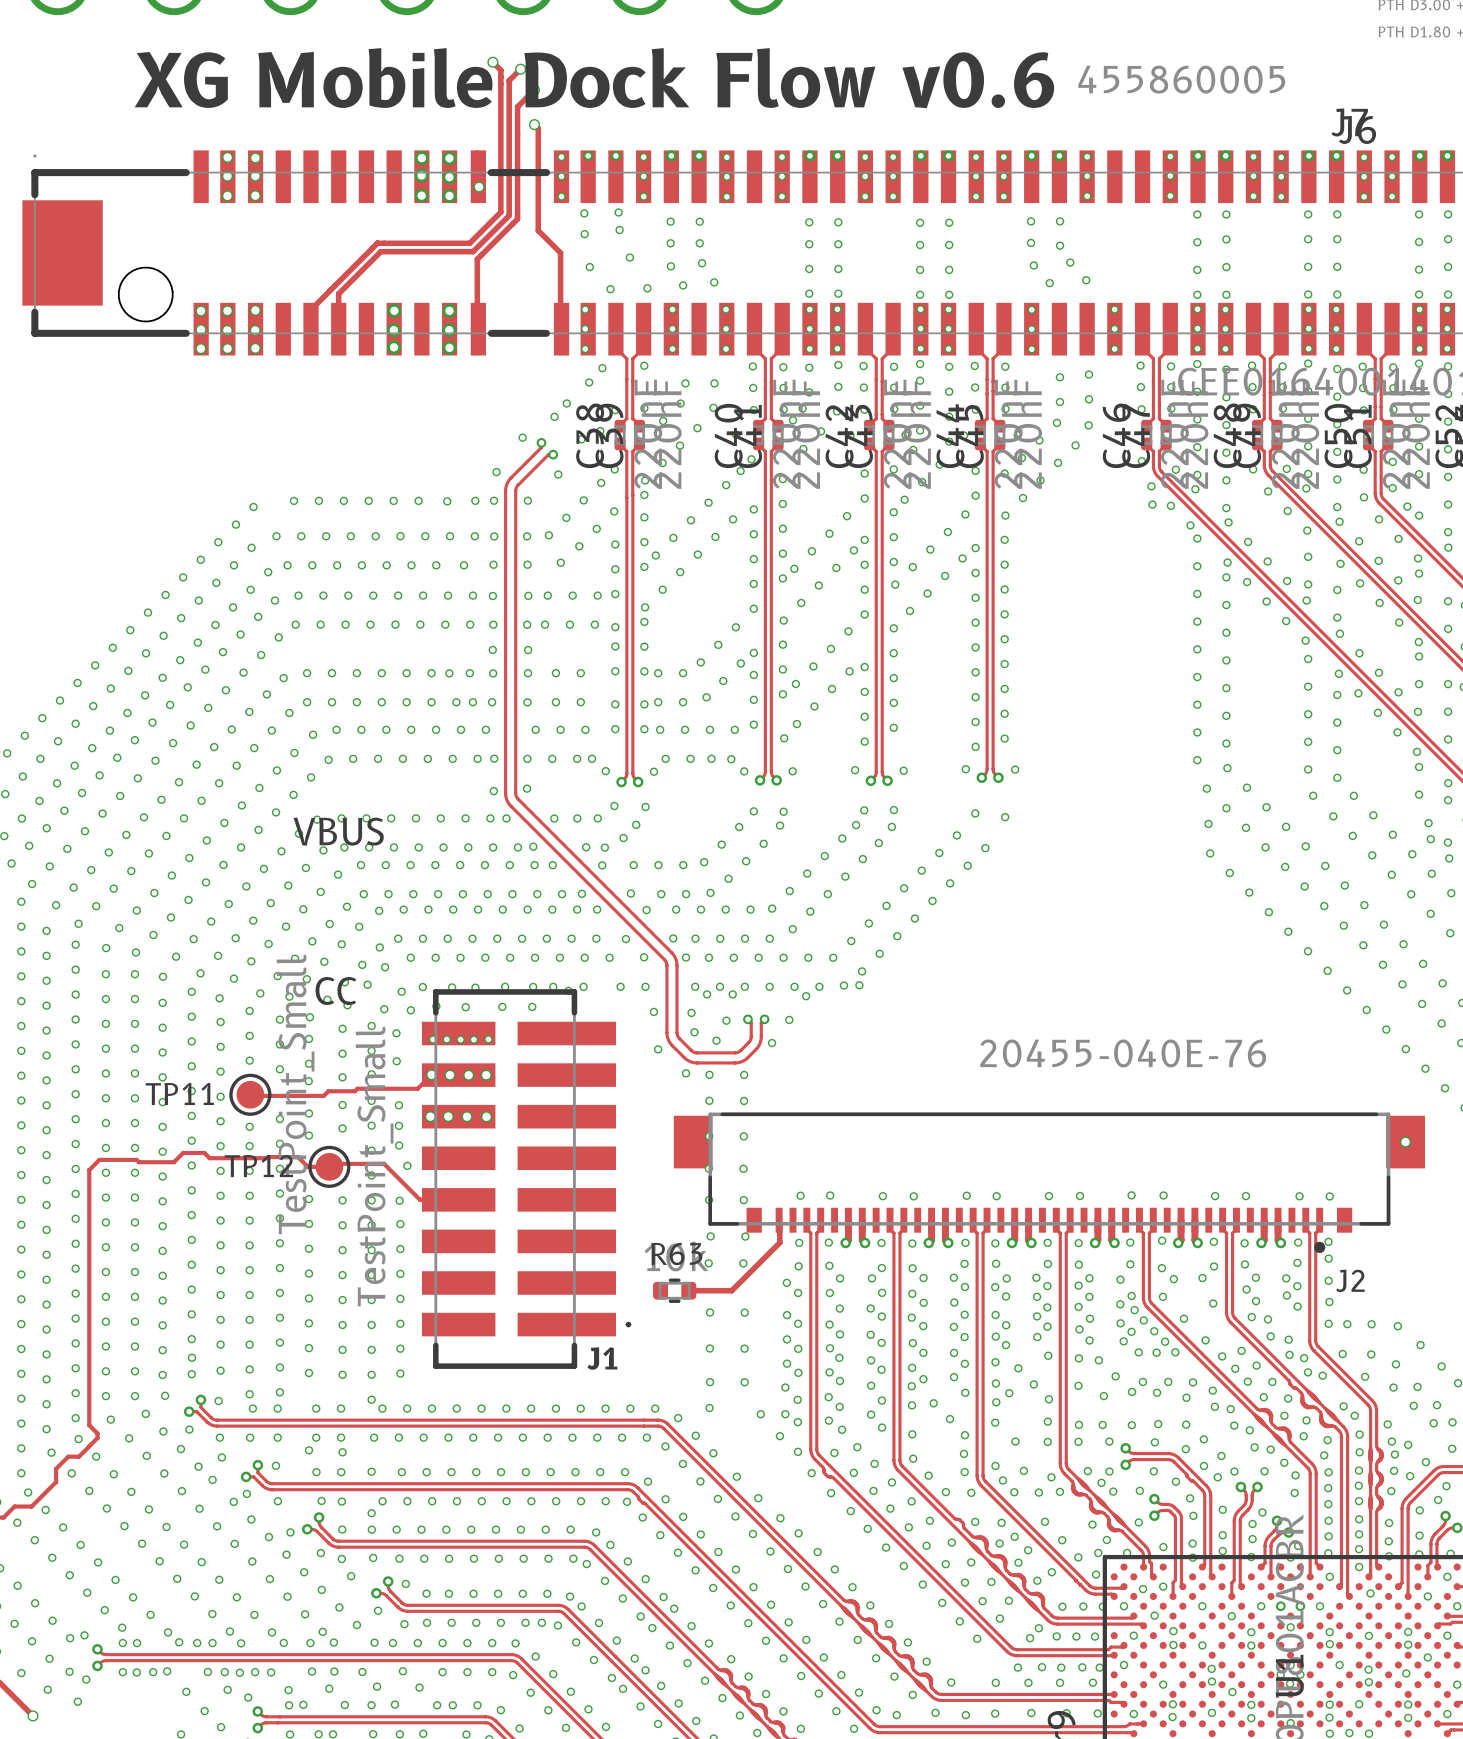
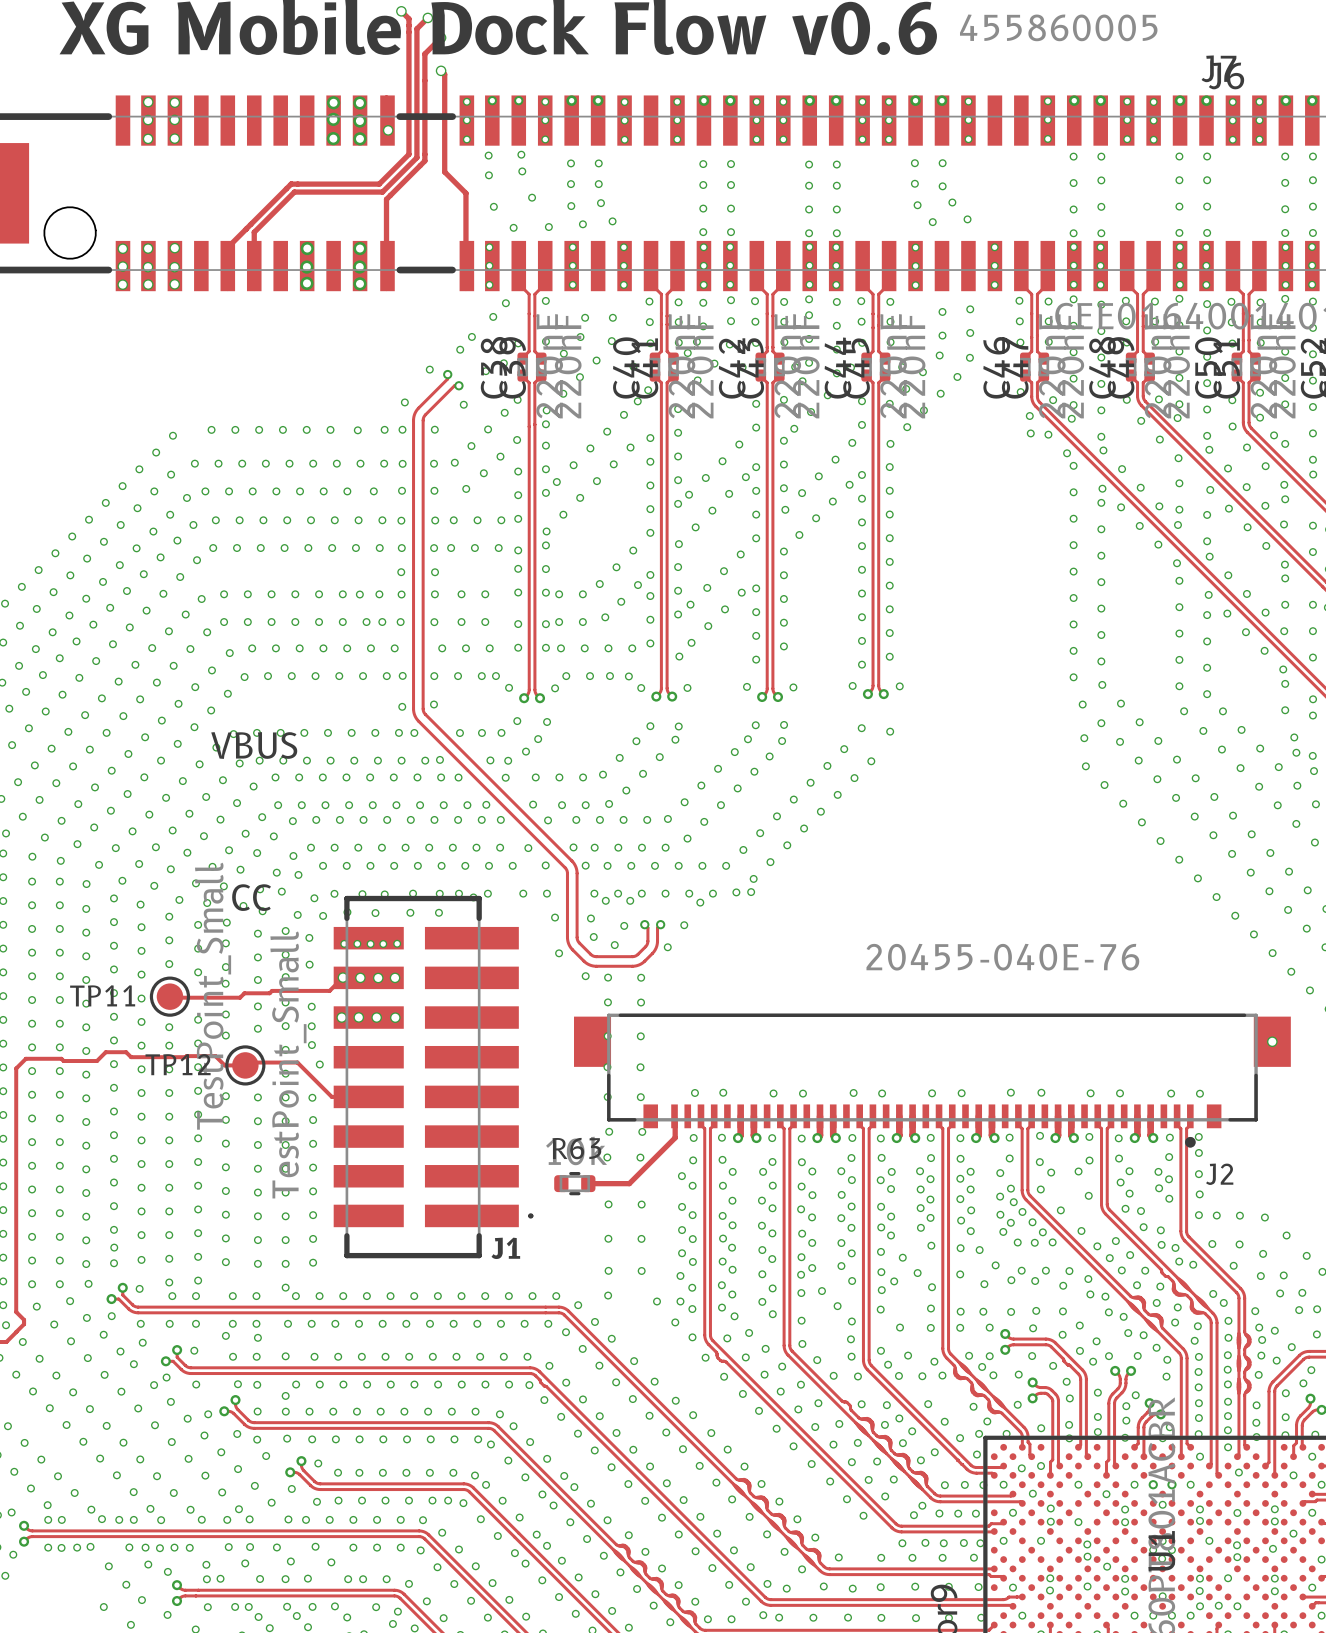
via position: (1163, 1684) -> (1041, 1540)

